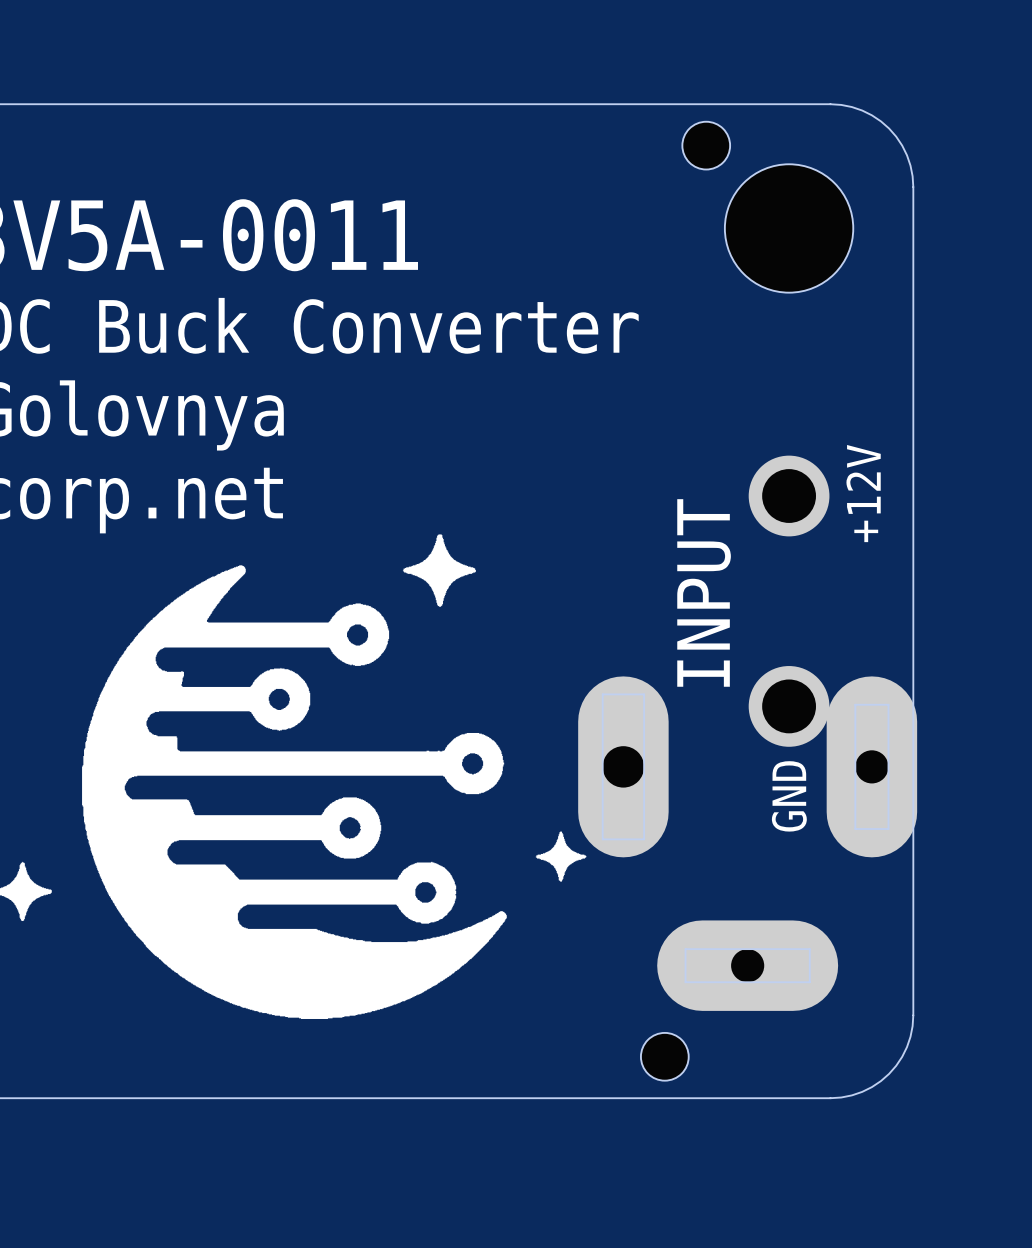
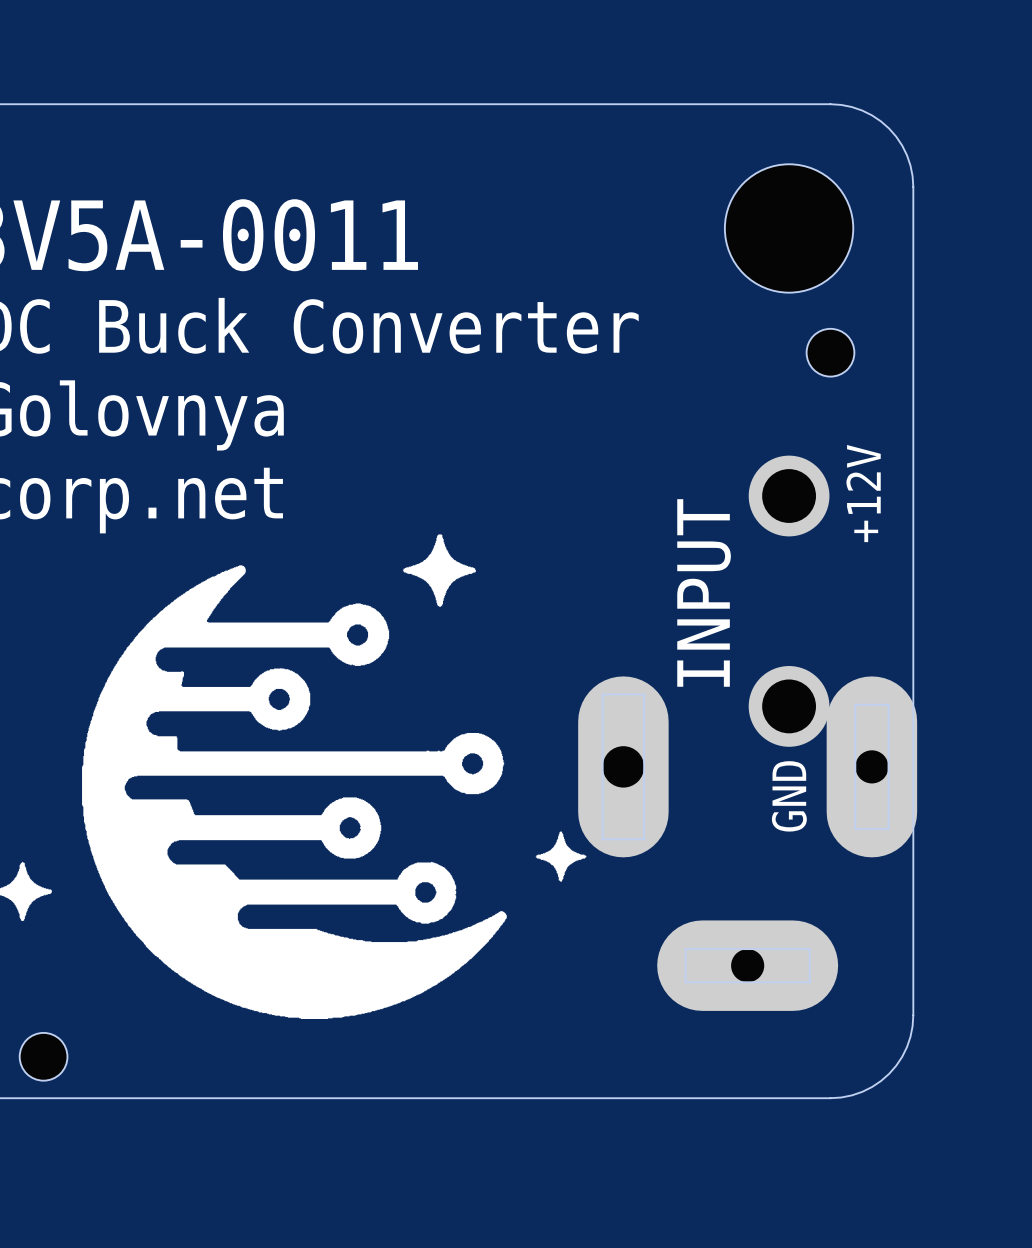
part position: (706, 145) -> (830, 352)
part: none -> (43, 1056)
part: (664, 1056) -> none

